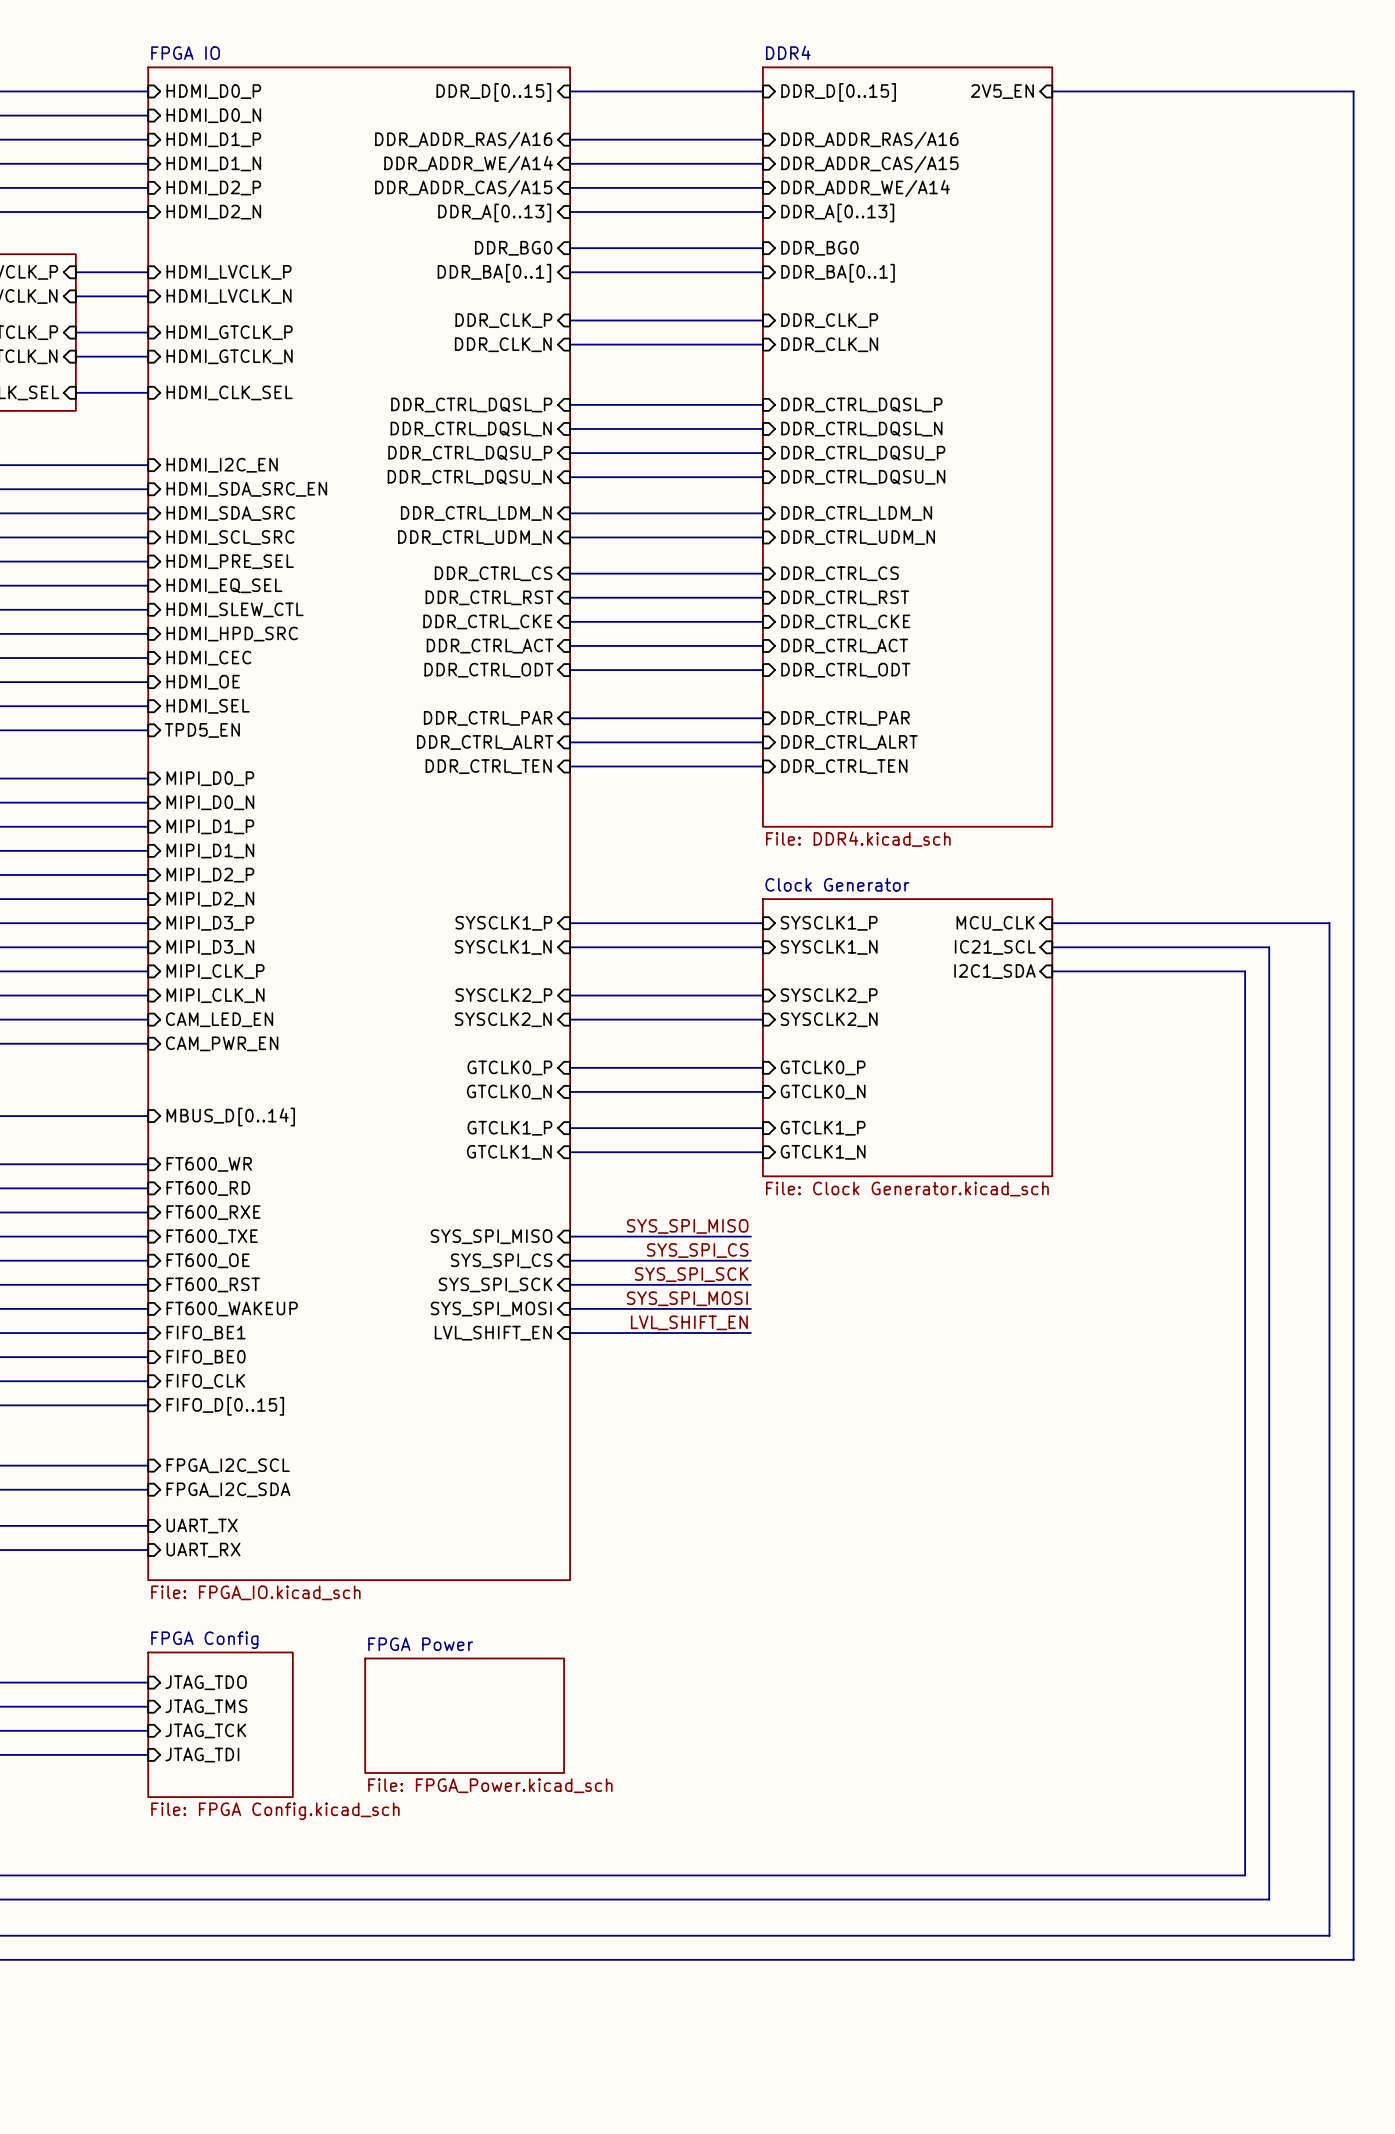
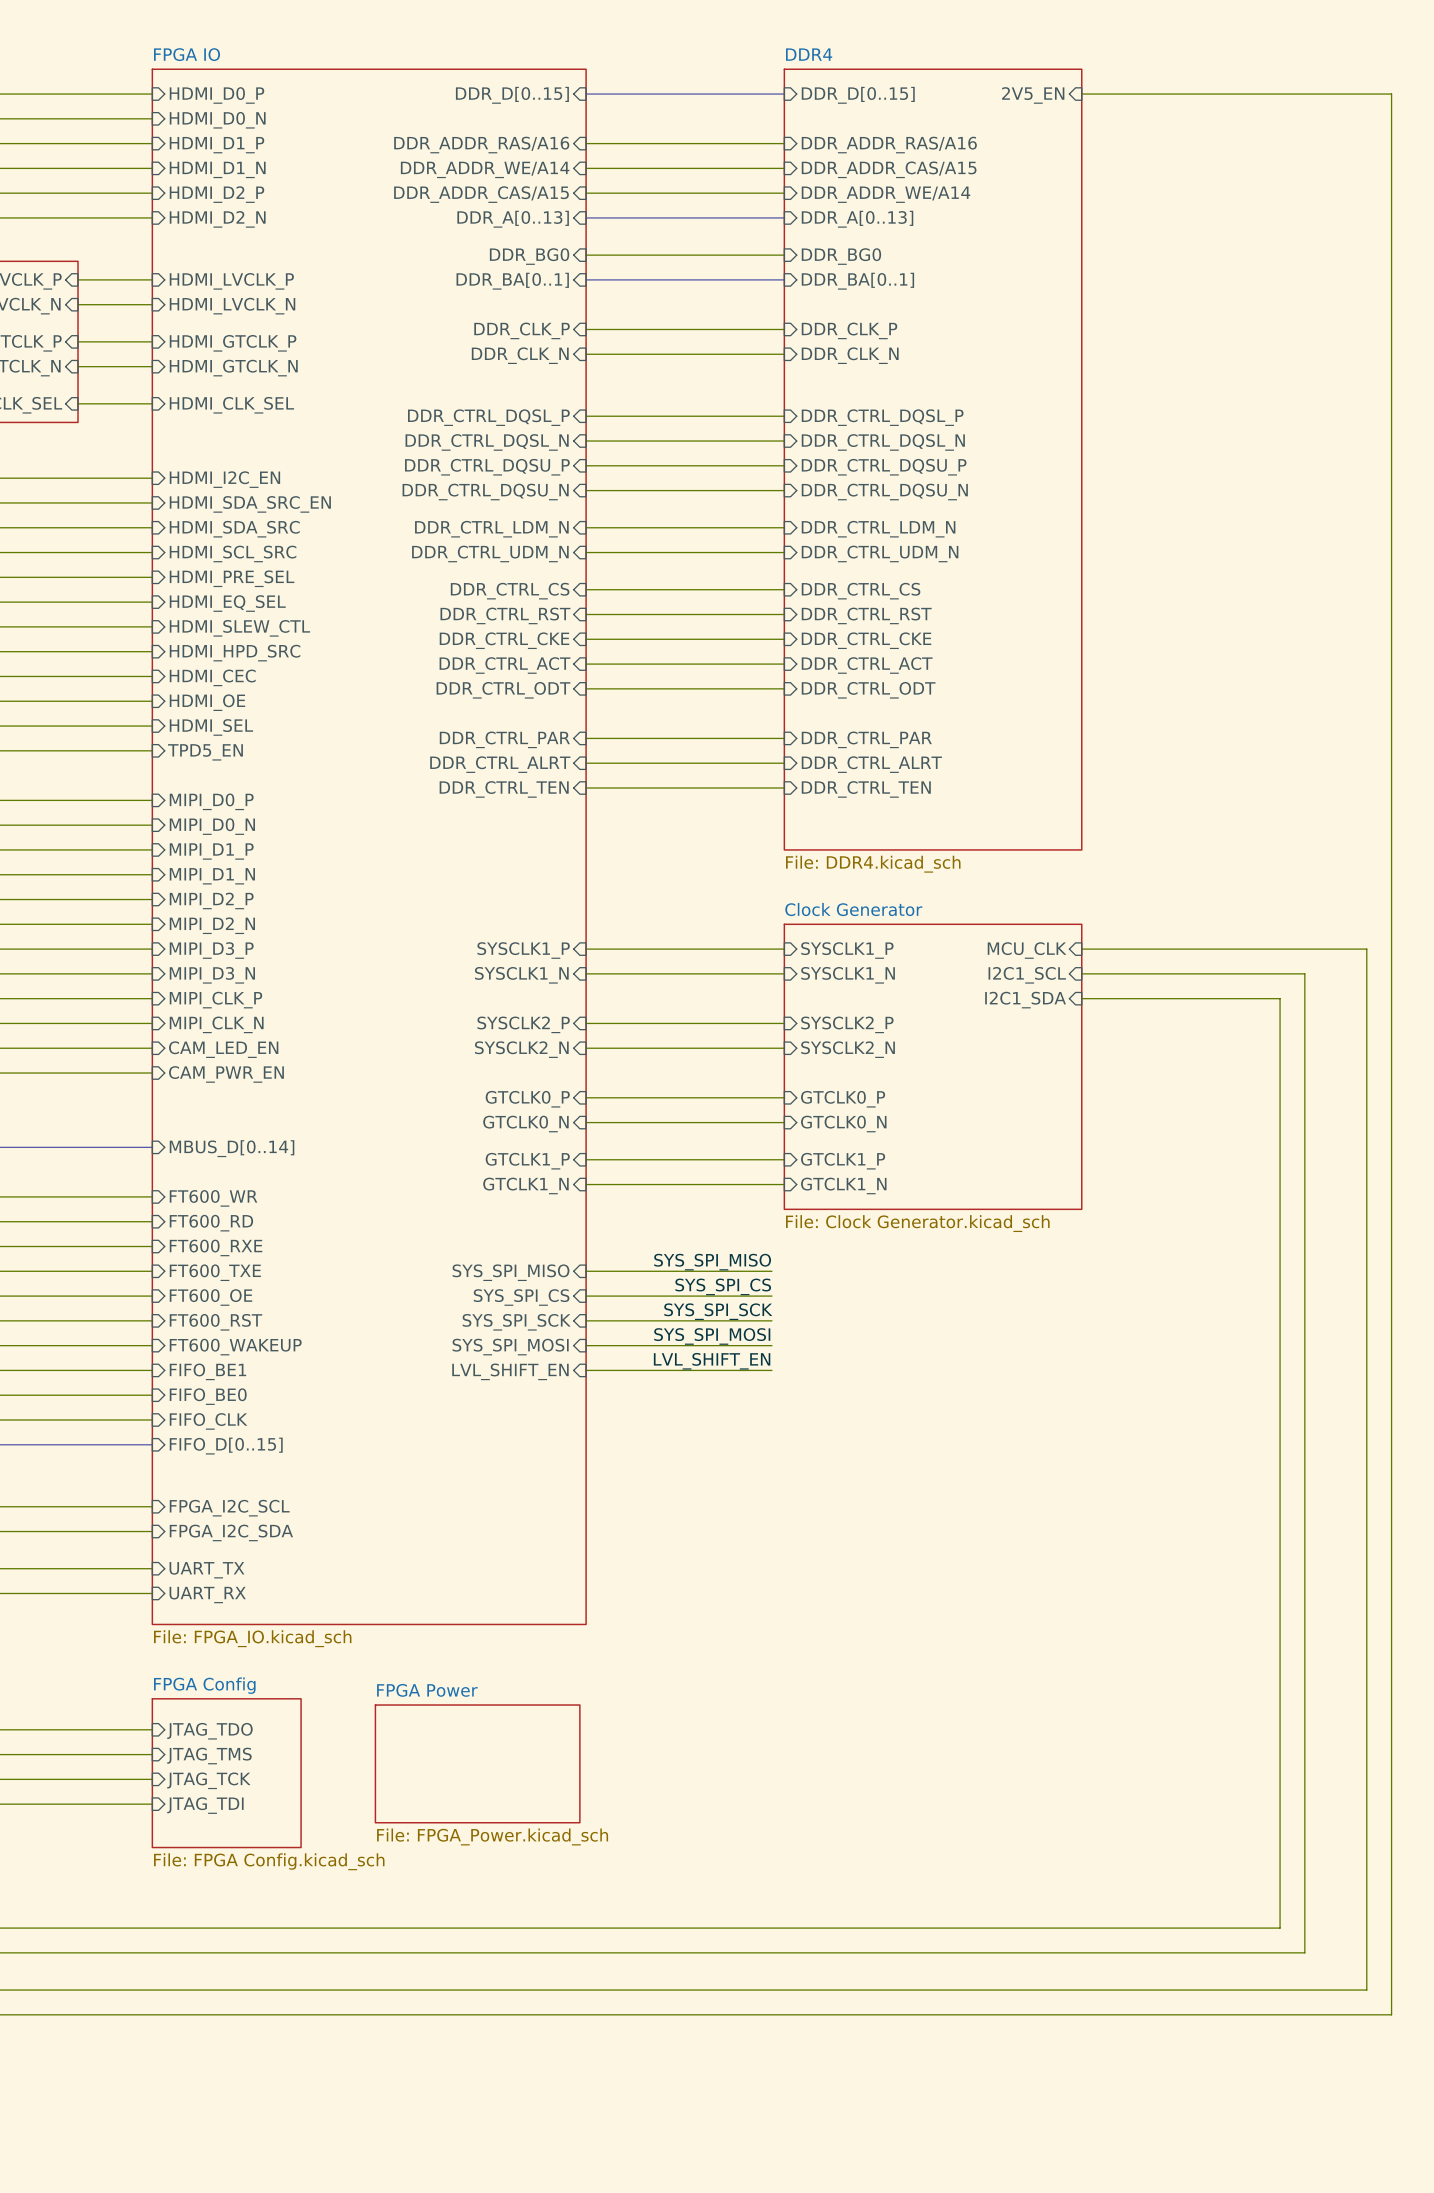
sheet pin: IC21_SCL (995, 947) -> I2C1_SCL (1027, 975)

